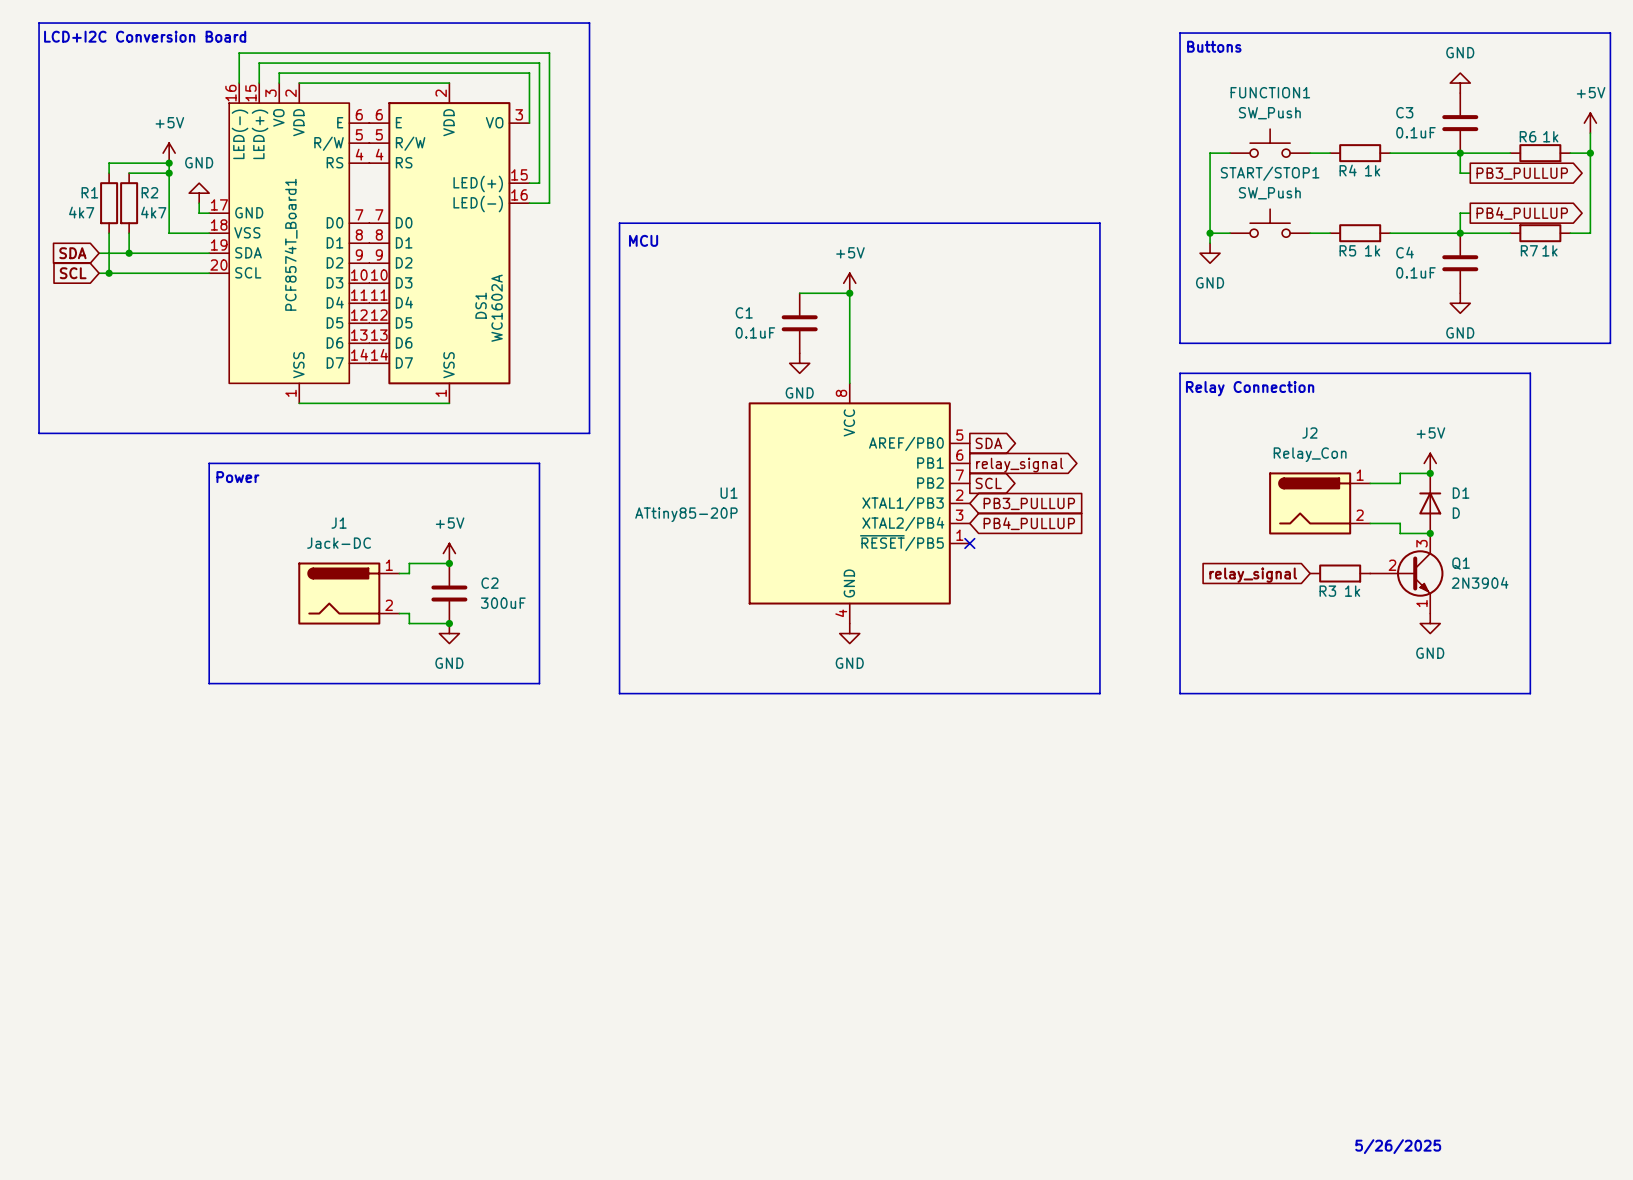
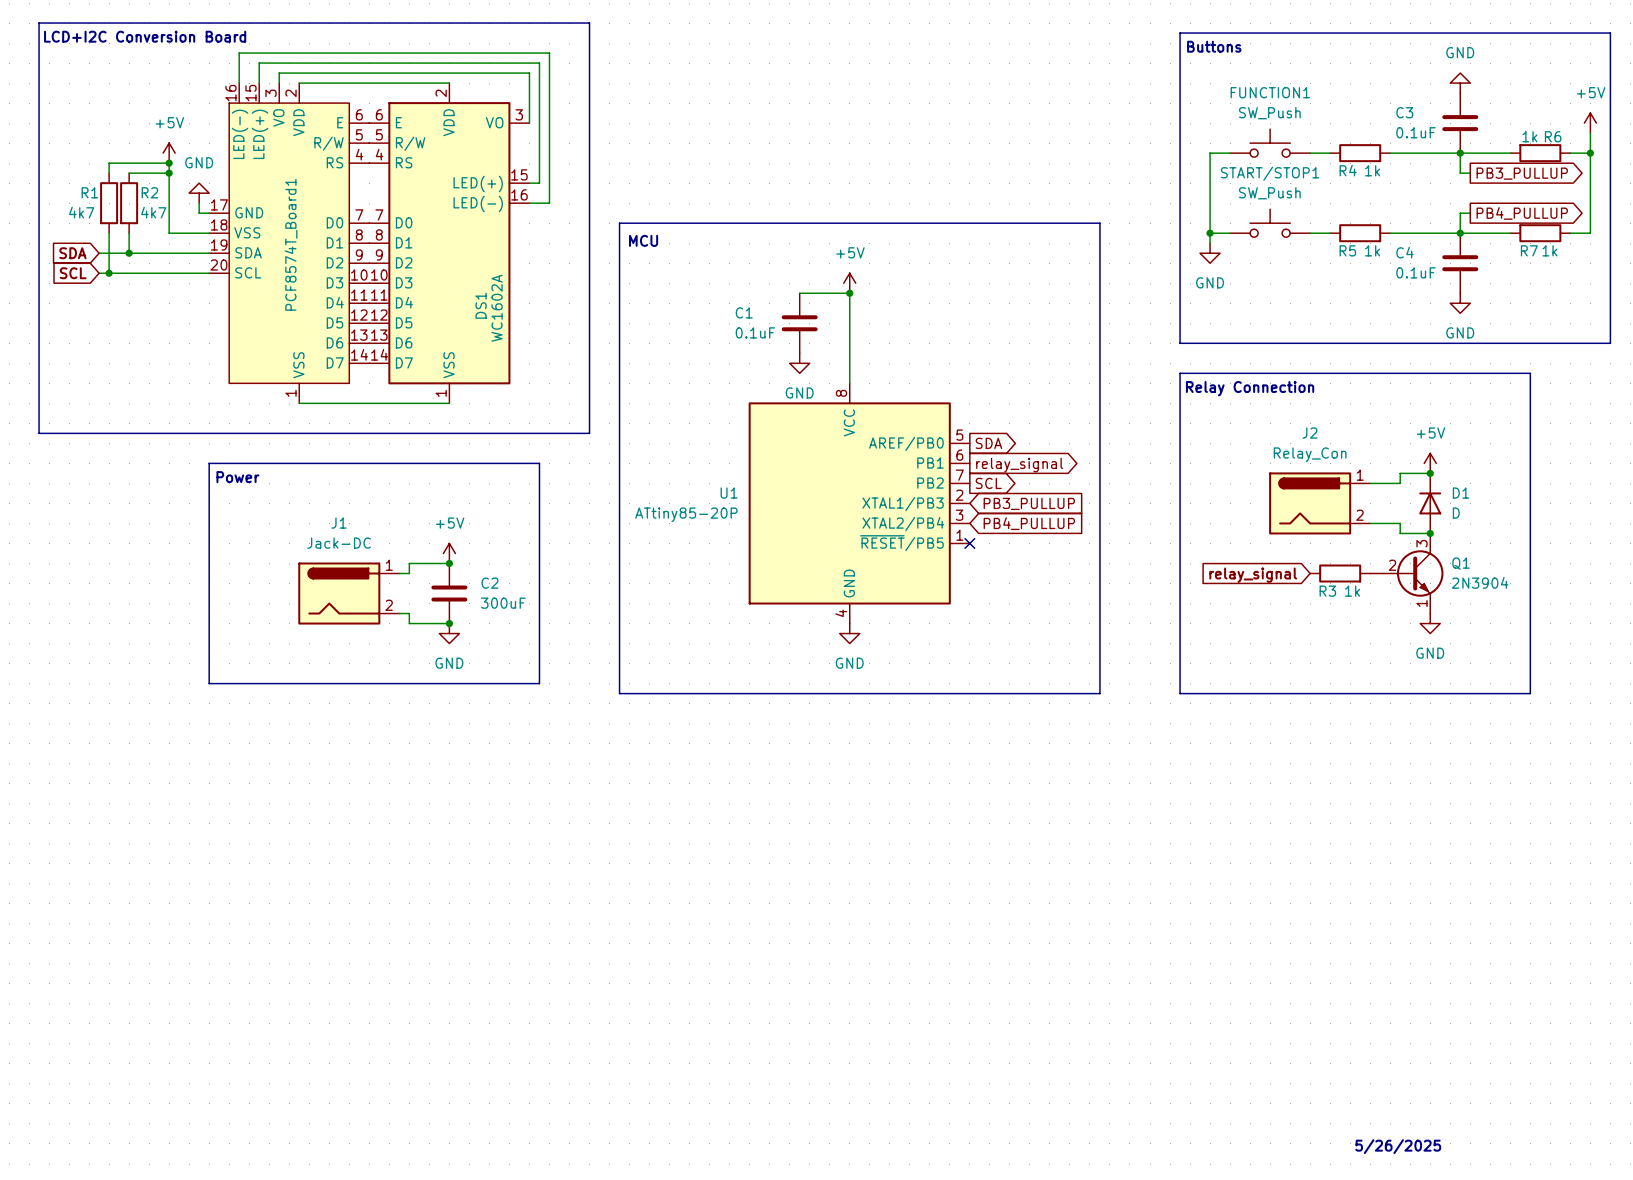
R6 name position: R6 (1528, 136) -> R6 (1553, 136)
R6 value position: 1k (1550, 136) -> 1k (1529, 136)

